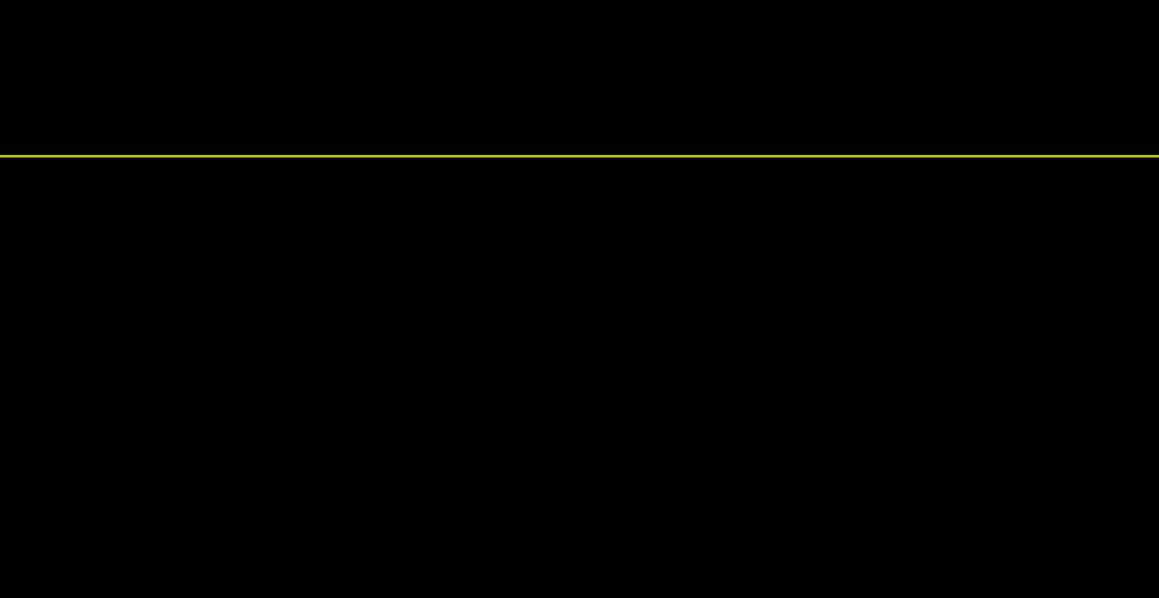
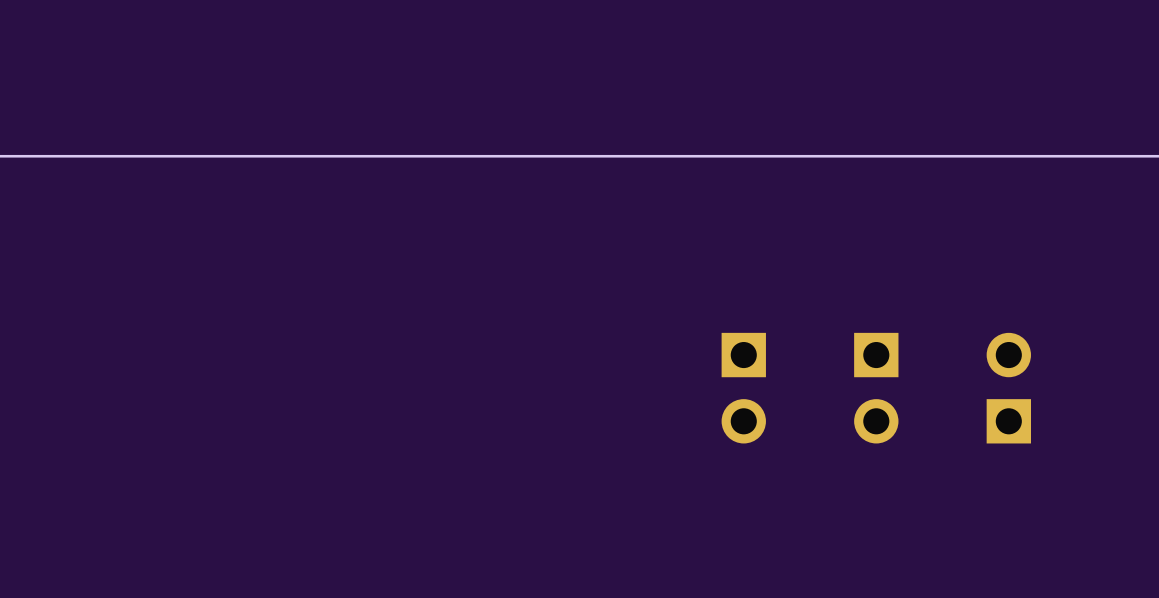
part: none -> (743, 388)
part: none -> (876, 388)
part: none -> (1008, 388)

